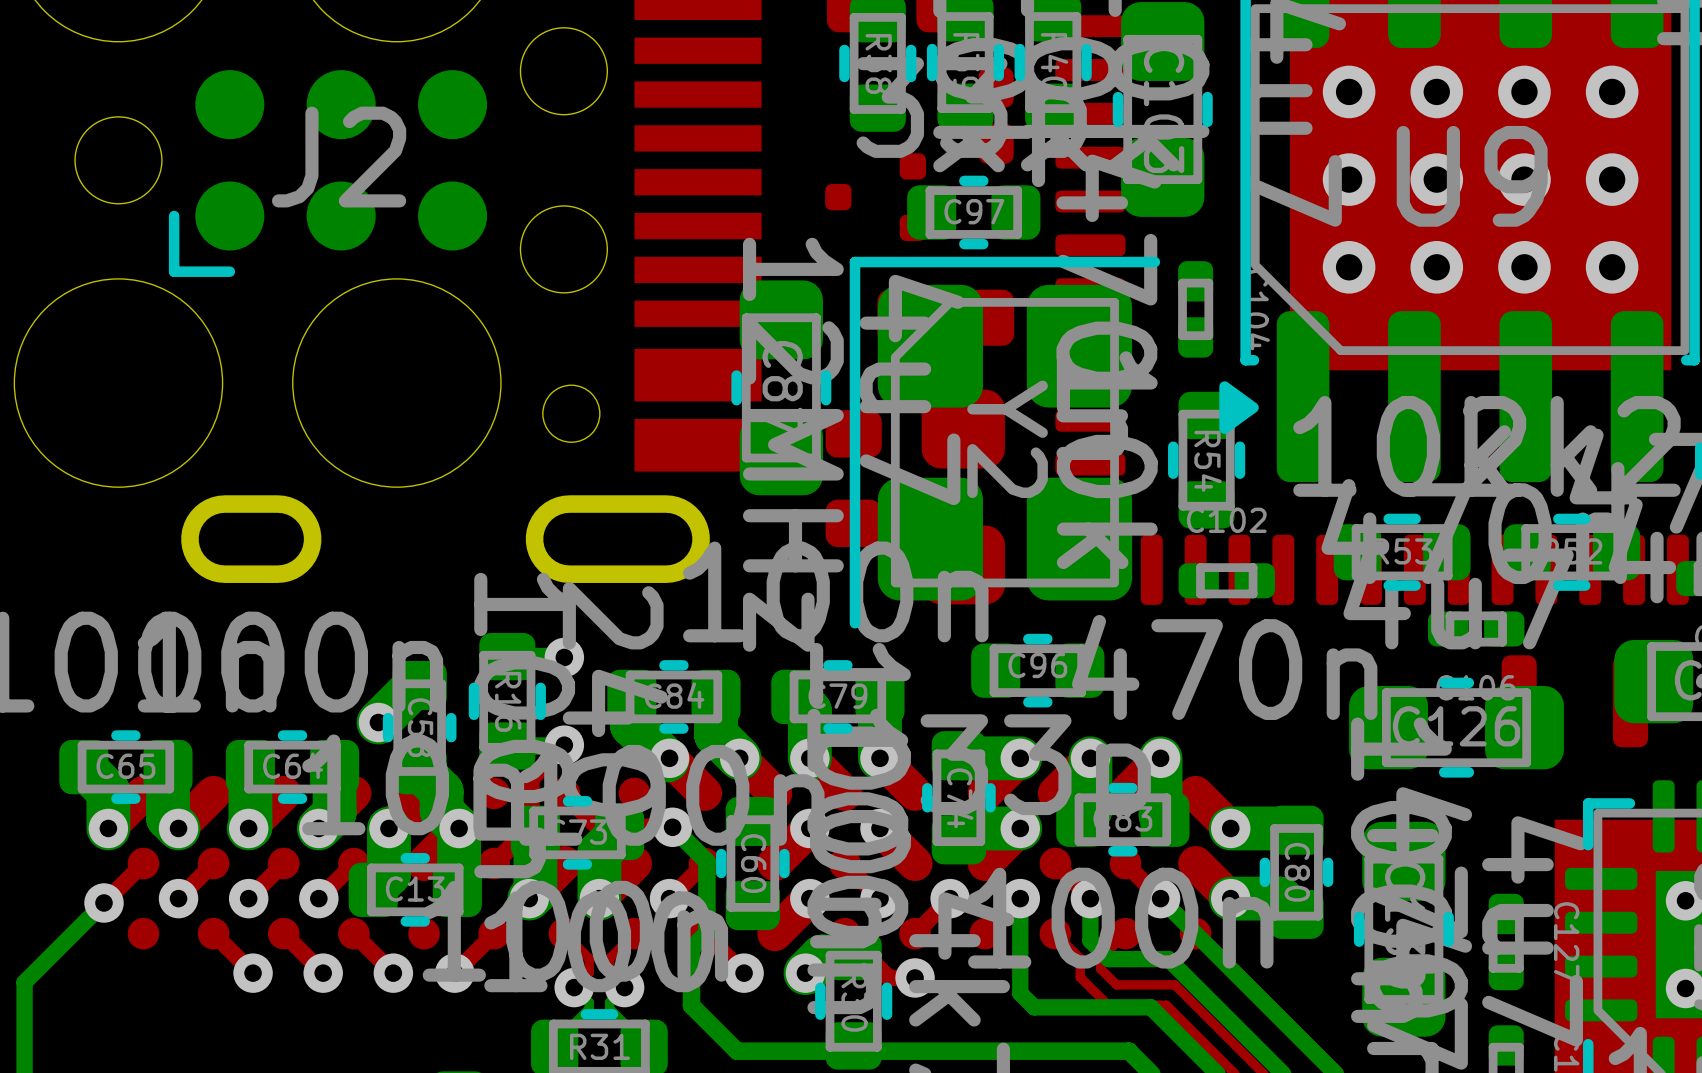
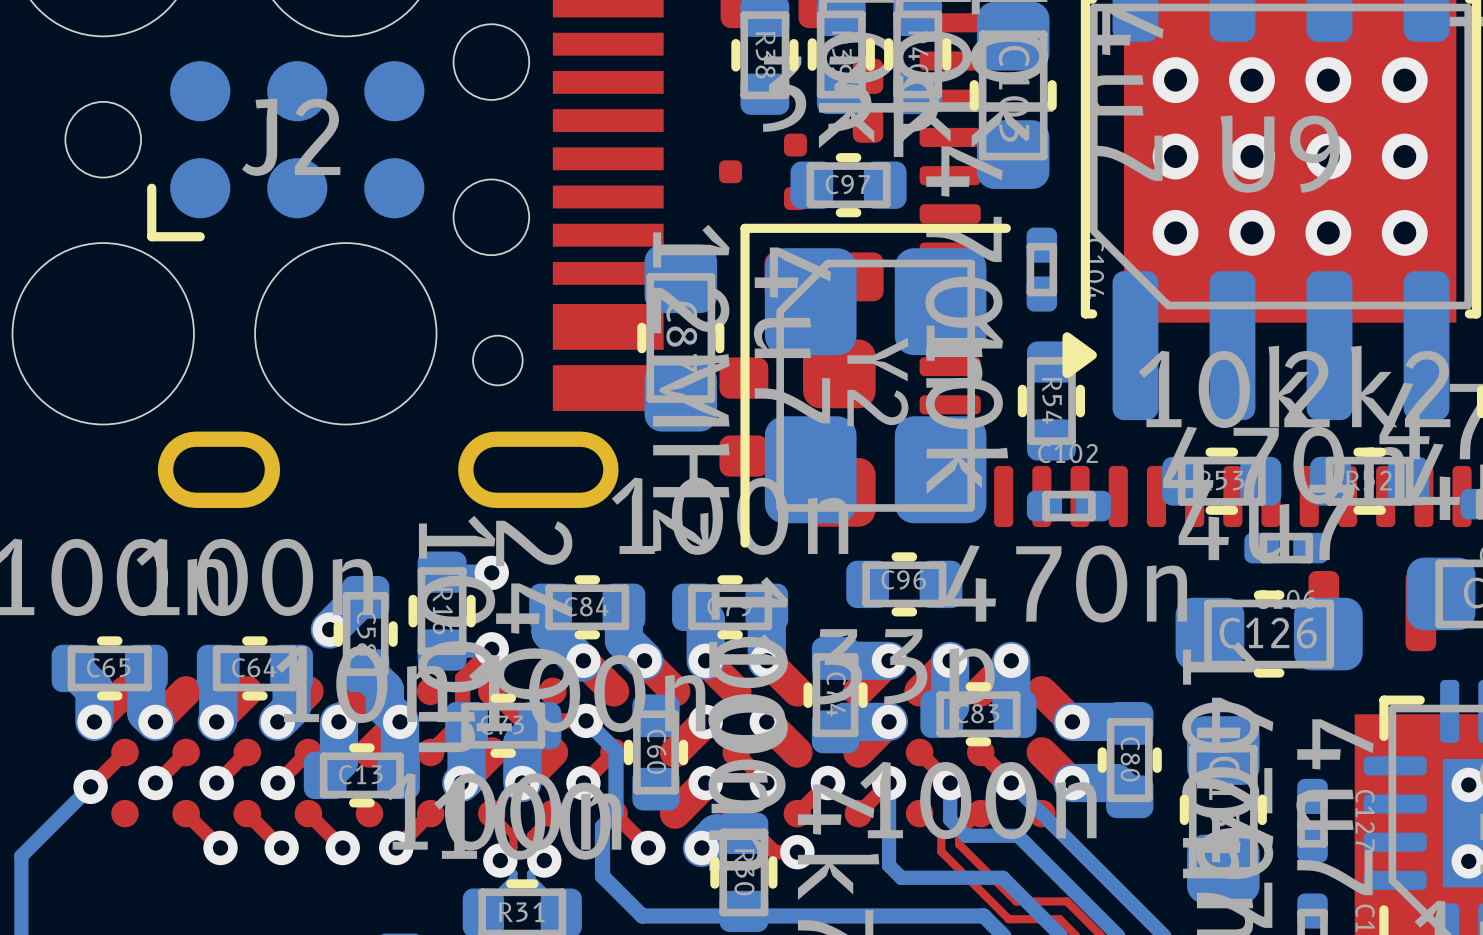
top track: (1116, 984) (1174, 984) (1224, 1034) -> (972, 858) (1016, 901) (1066, 901)
top track: (1108, 1005) (1166, 1005) (1216, 1054) -> (965, 875) (1008, 919) (1059, 919)

